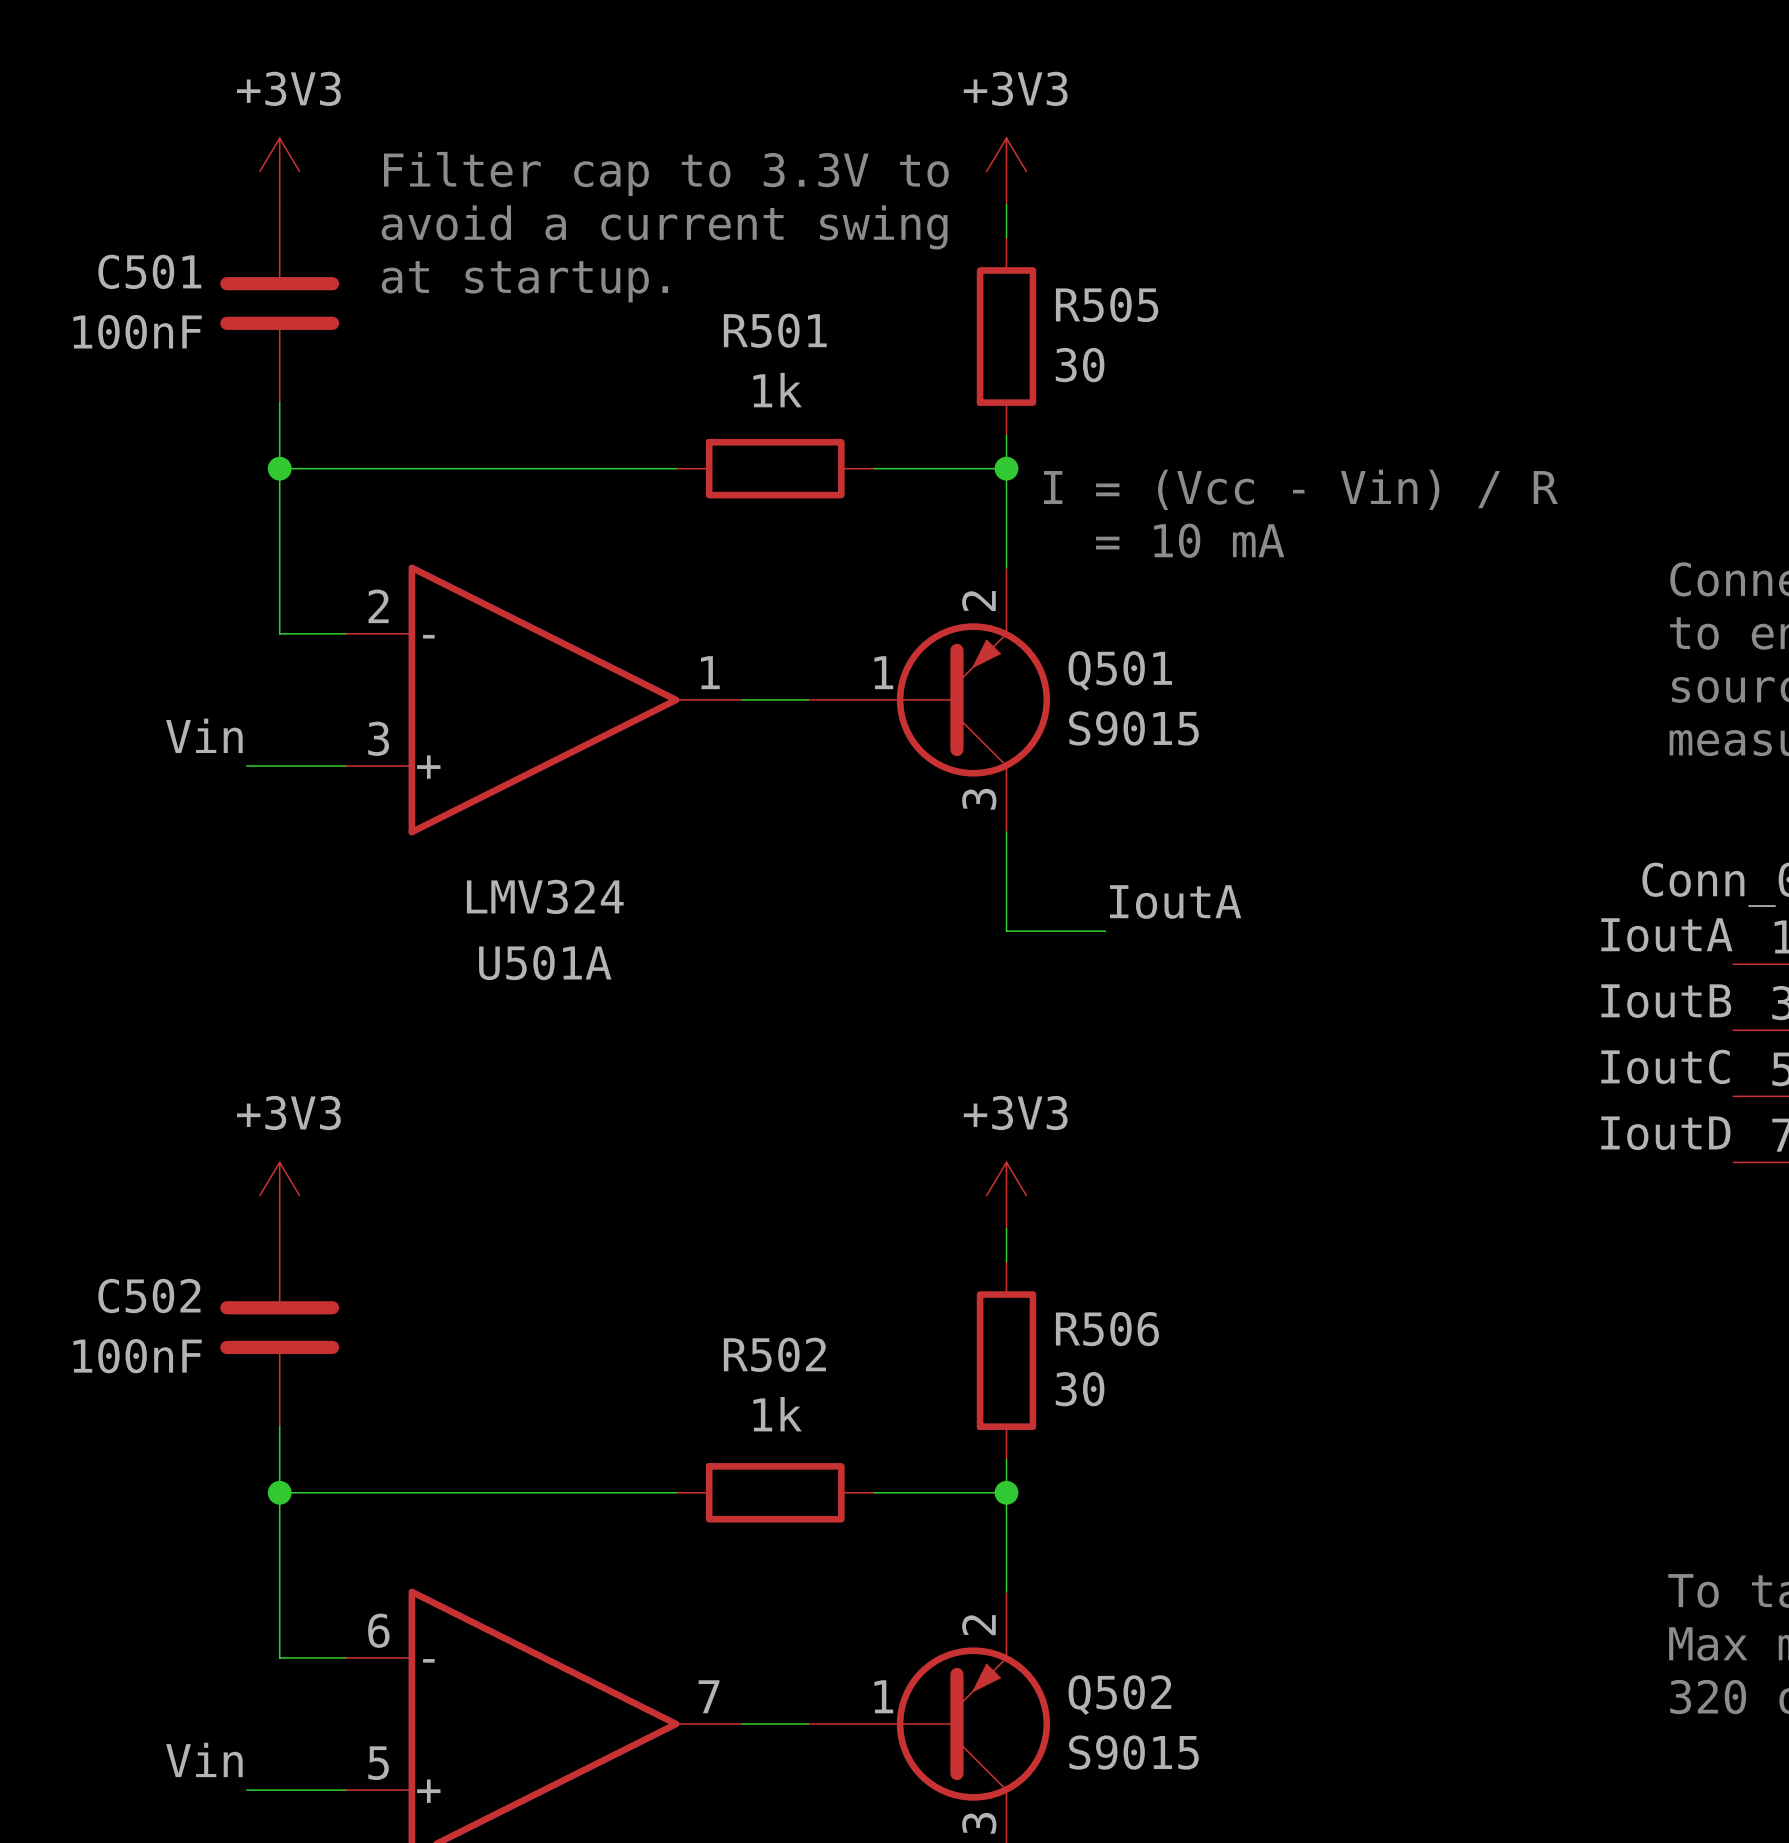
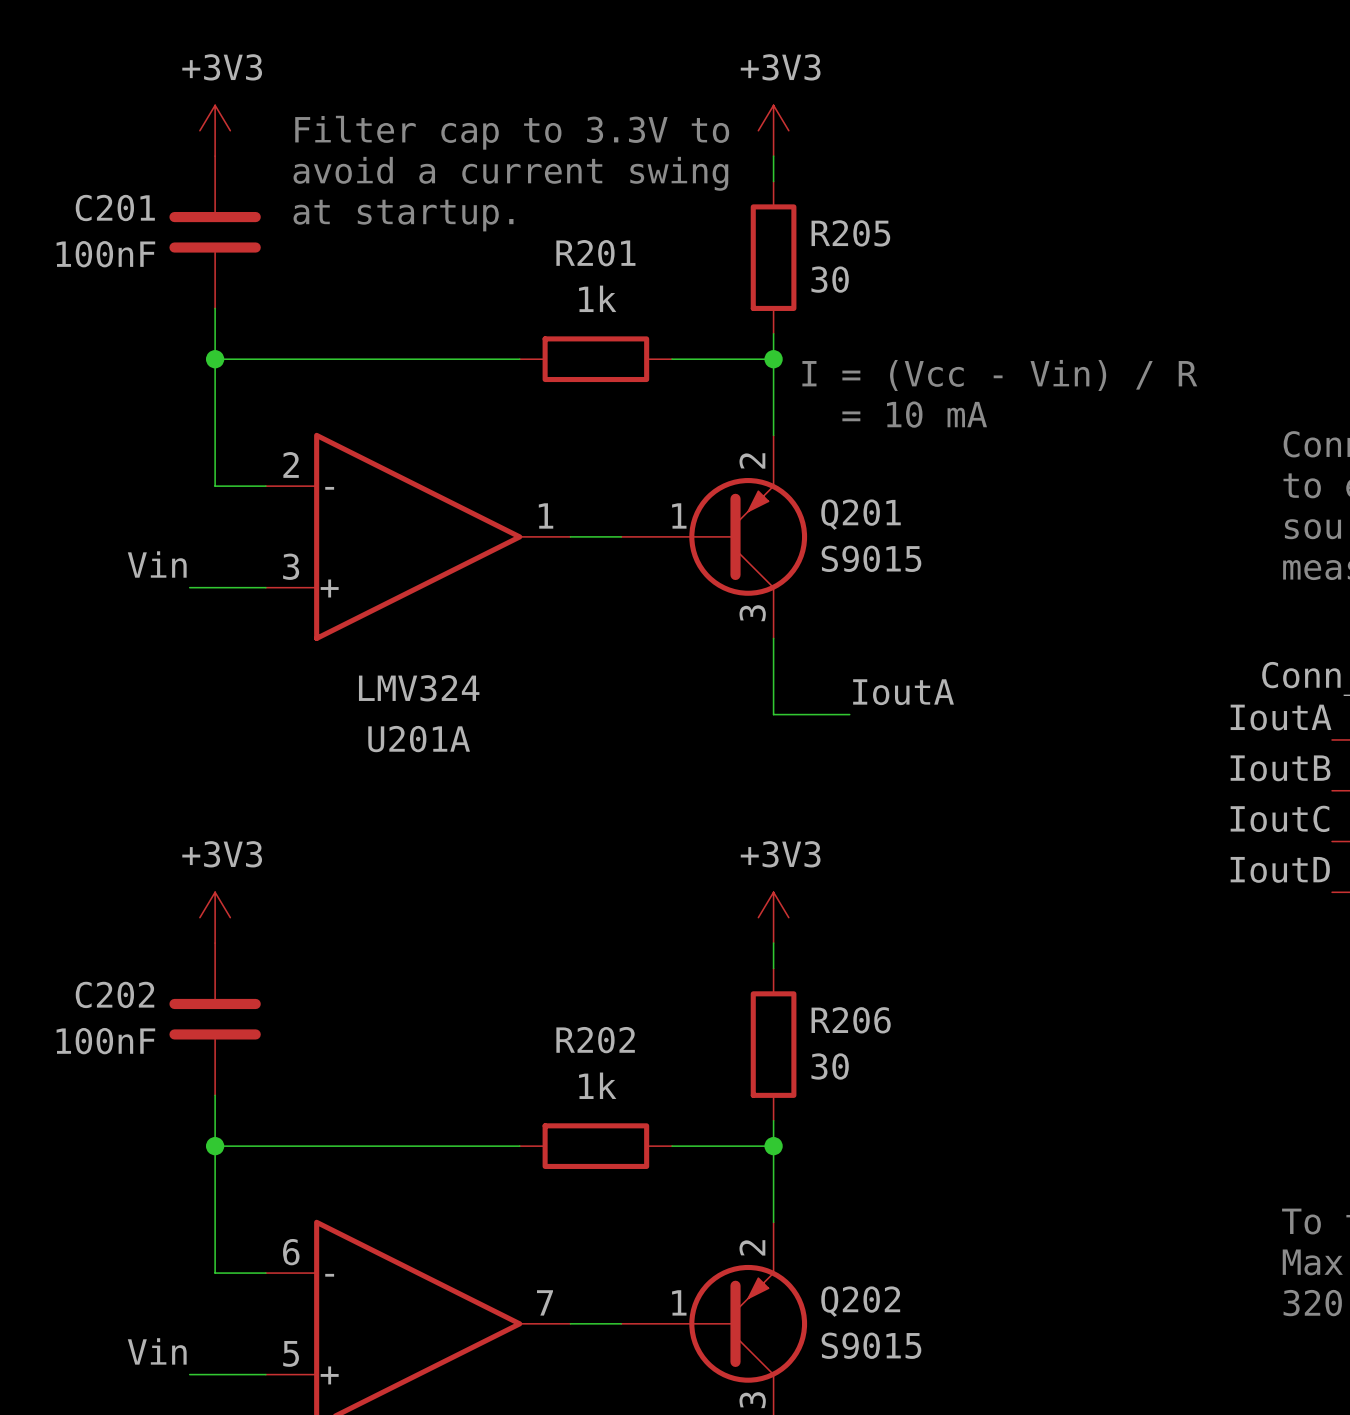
C501 name: C501 (149, 271) -> C201 (115, 208)
R505 name: R505 (1107, 304) -> R205 (850, 233)
R501 name: R501 (775, 330) -> R201 (595, 253)
Q501 name: Q501 (1120, 670) -> Q201 (861, 514)
U501A name: U501A (545, 963) -> U201A (419, 739)
C502 name: C502 (149, 1296) -> C202 (115, 994)
R506 name: R506 (1107, 1329) -> R206 (851, 1020)
R502 name: R502 (774, 1354) -> R202 (595, 1040)
Q502 name: Q502 (1119, 1695) -> Q202 (860, 1301)

